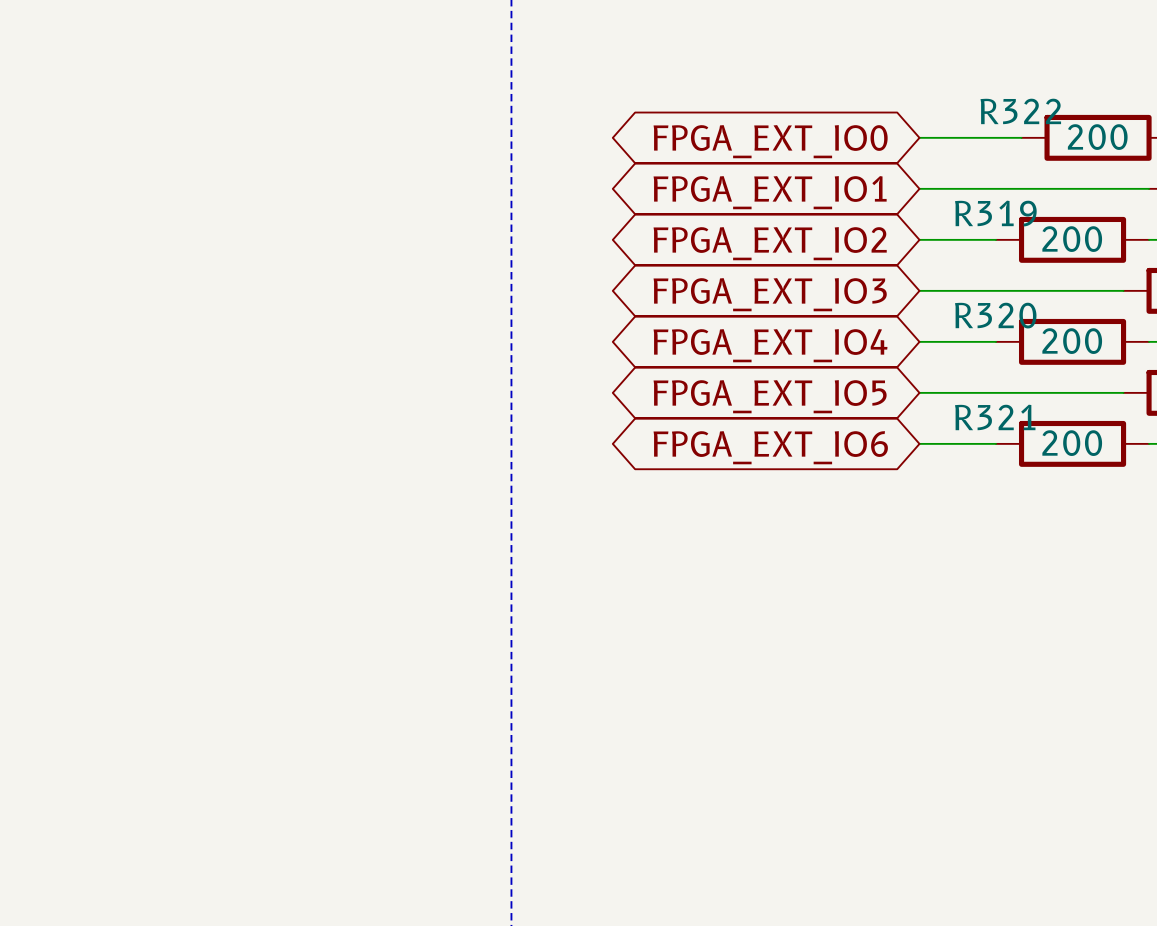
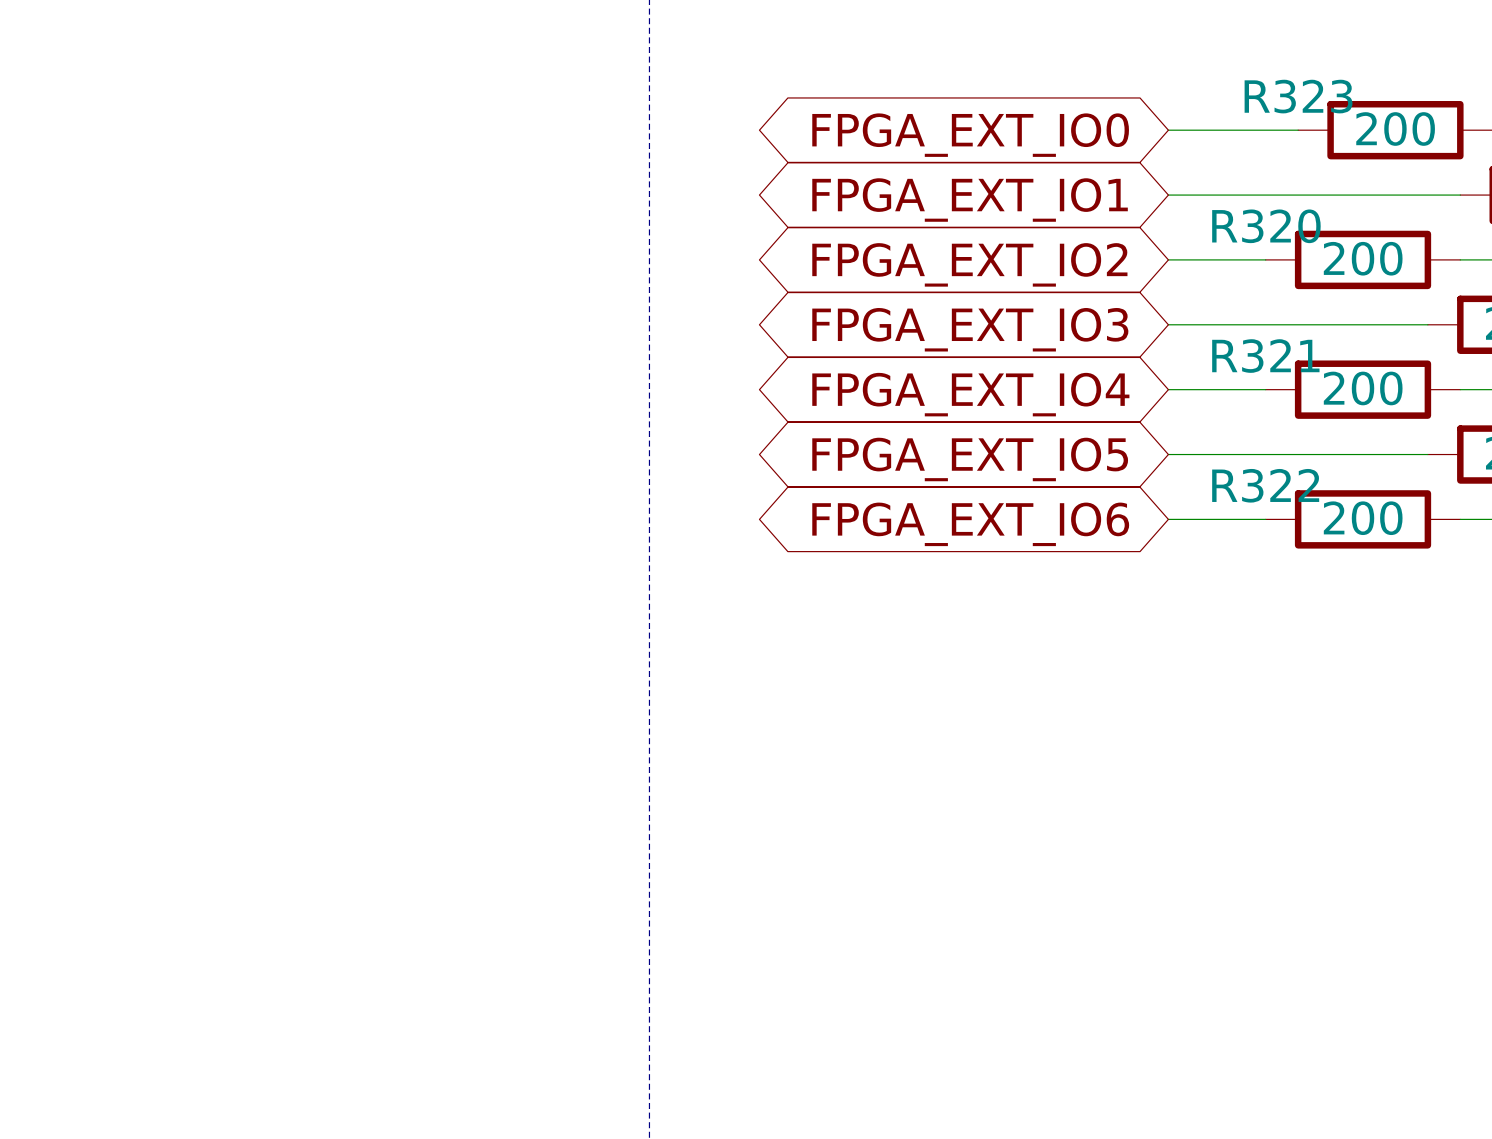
R322 name: R322 (1020, 111) -> R323 (1298, 96)
R319 name: R319 (995, 213) -> R320 (1266, 226)
R320 name: R320 (995, 315) -> R321 (1265, 356)
R321 name: R321 (995, 417) -> R322 (1265, 485)

